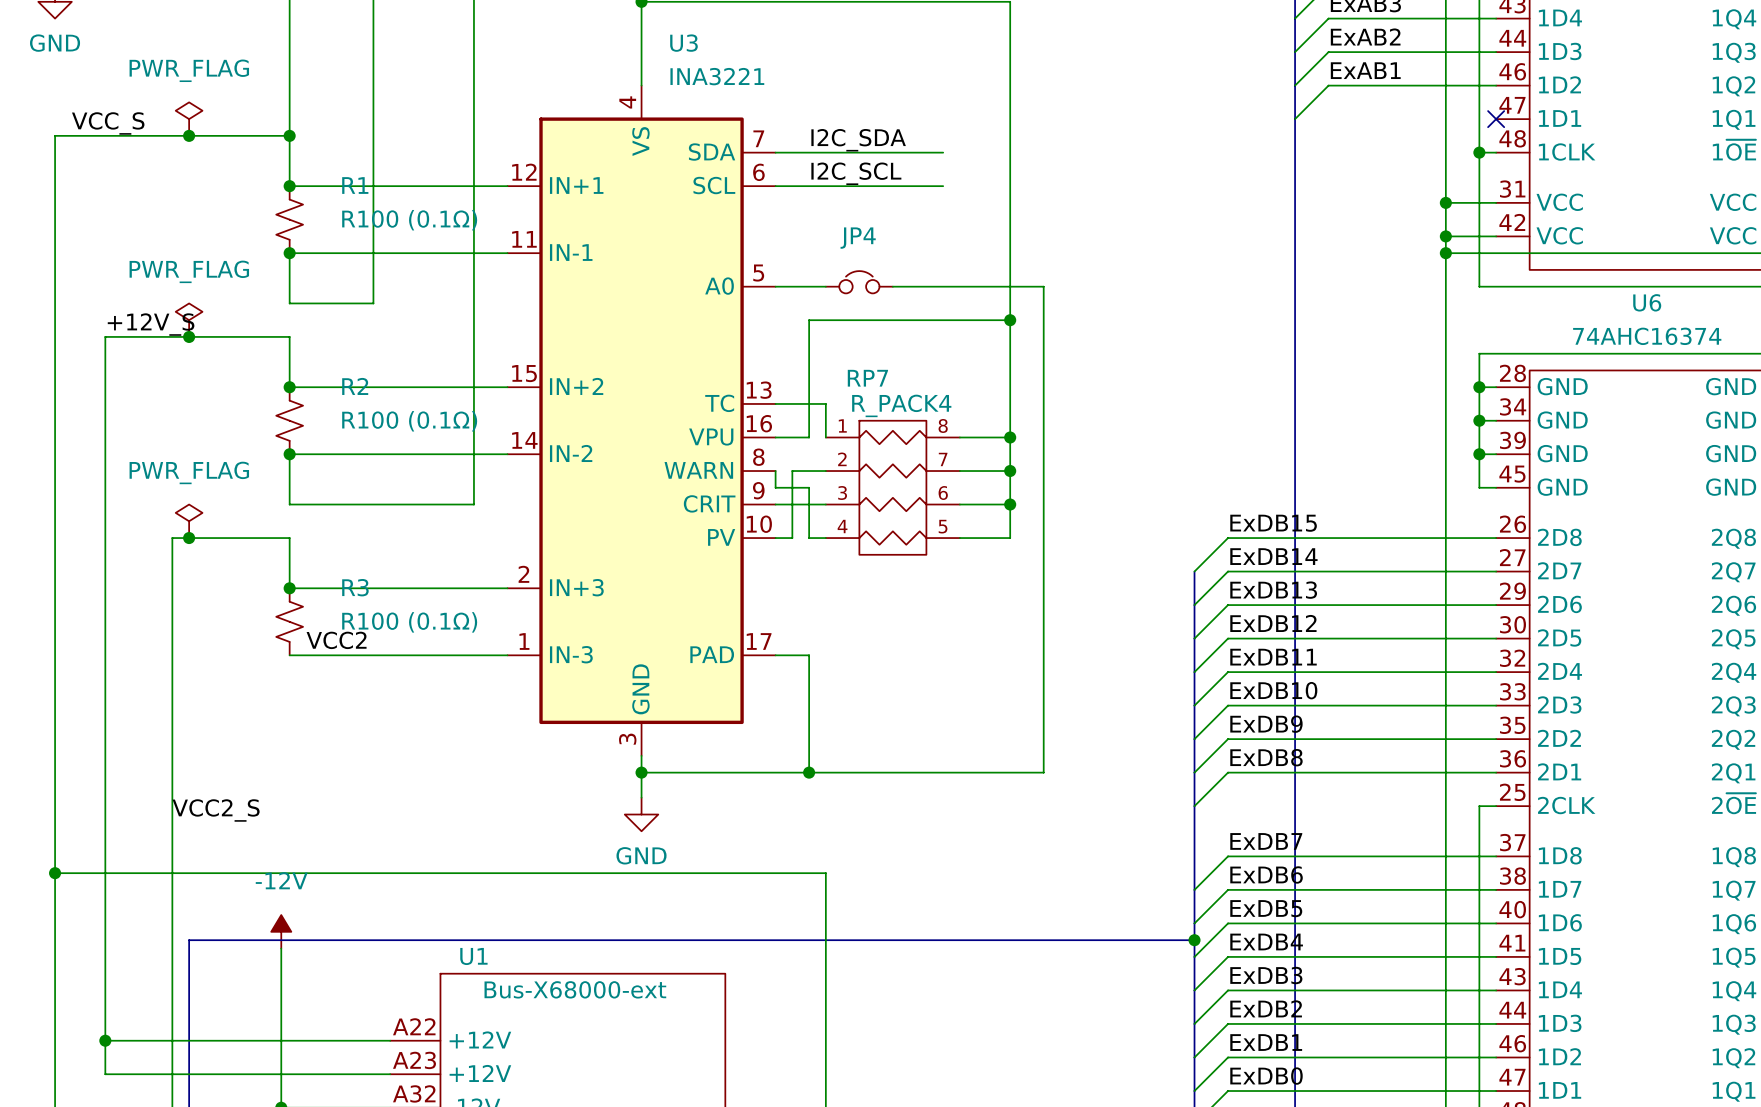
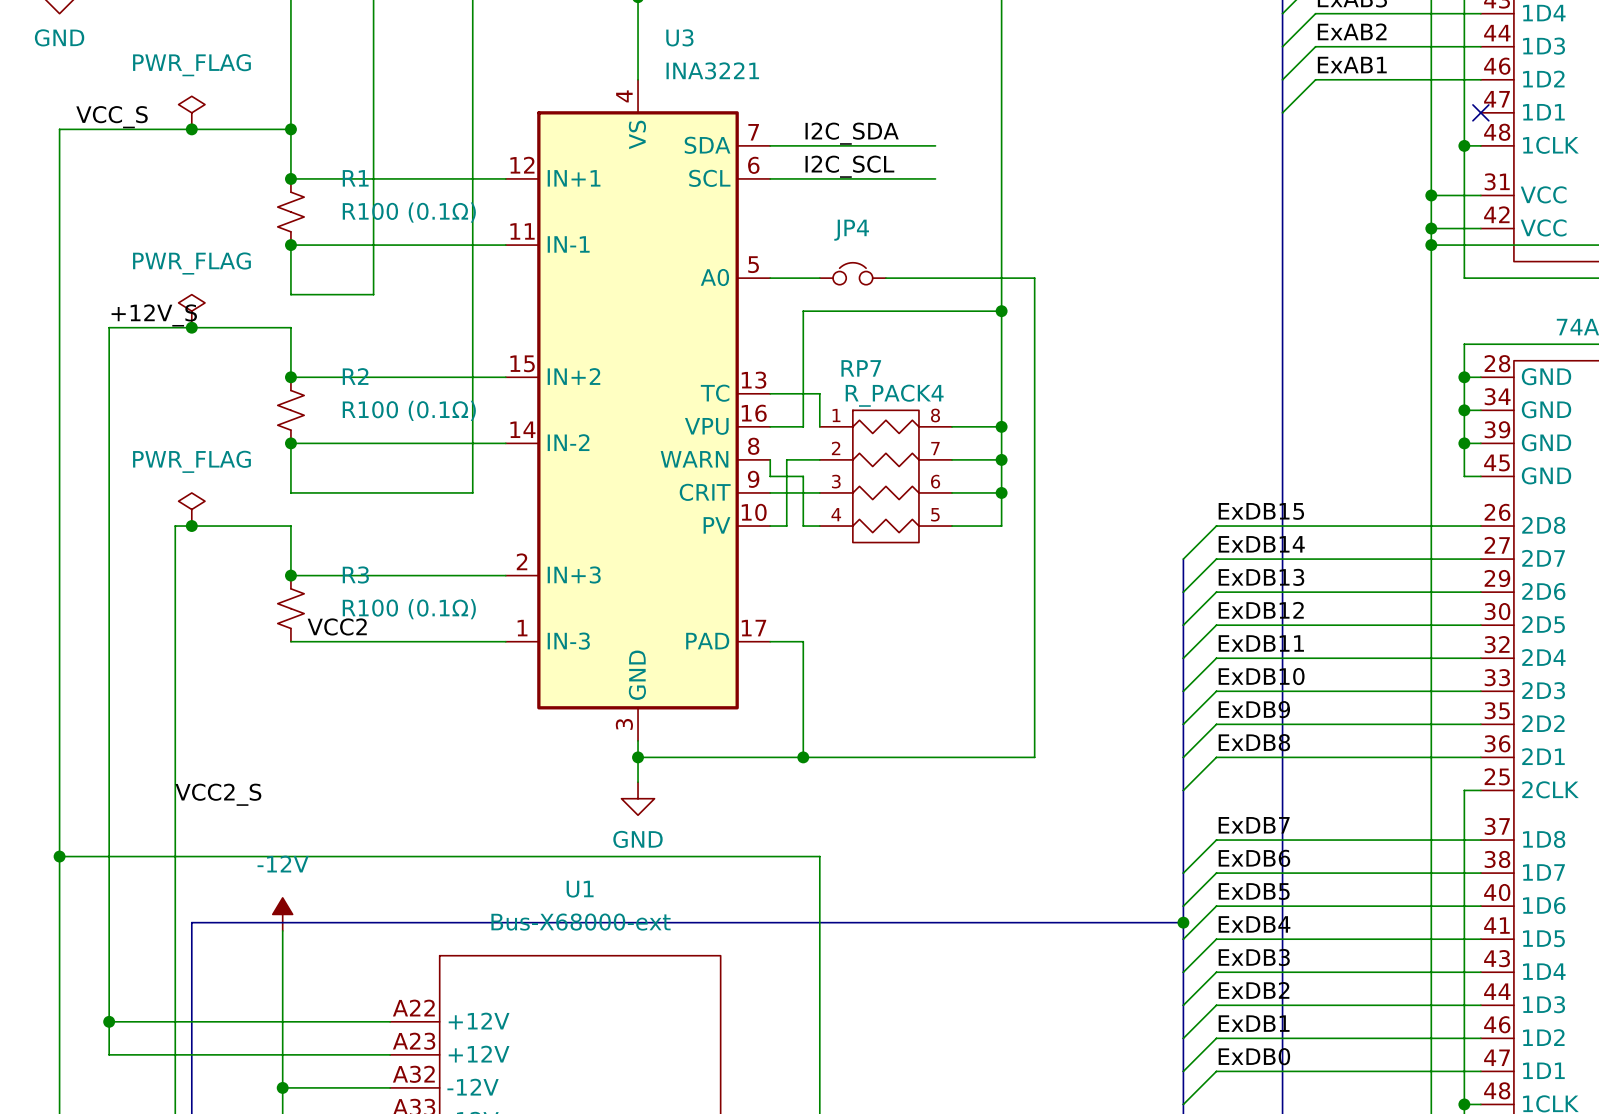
U1 name position: U1 (473, 956) -> U1 (580, 889)
U1 value position: Bus-X68000-ext (575, 989) -> Bus-X68000-ext (581, 922)

